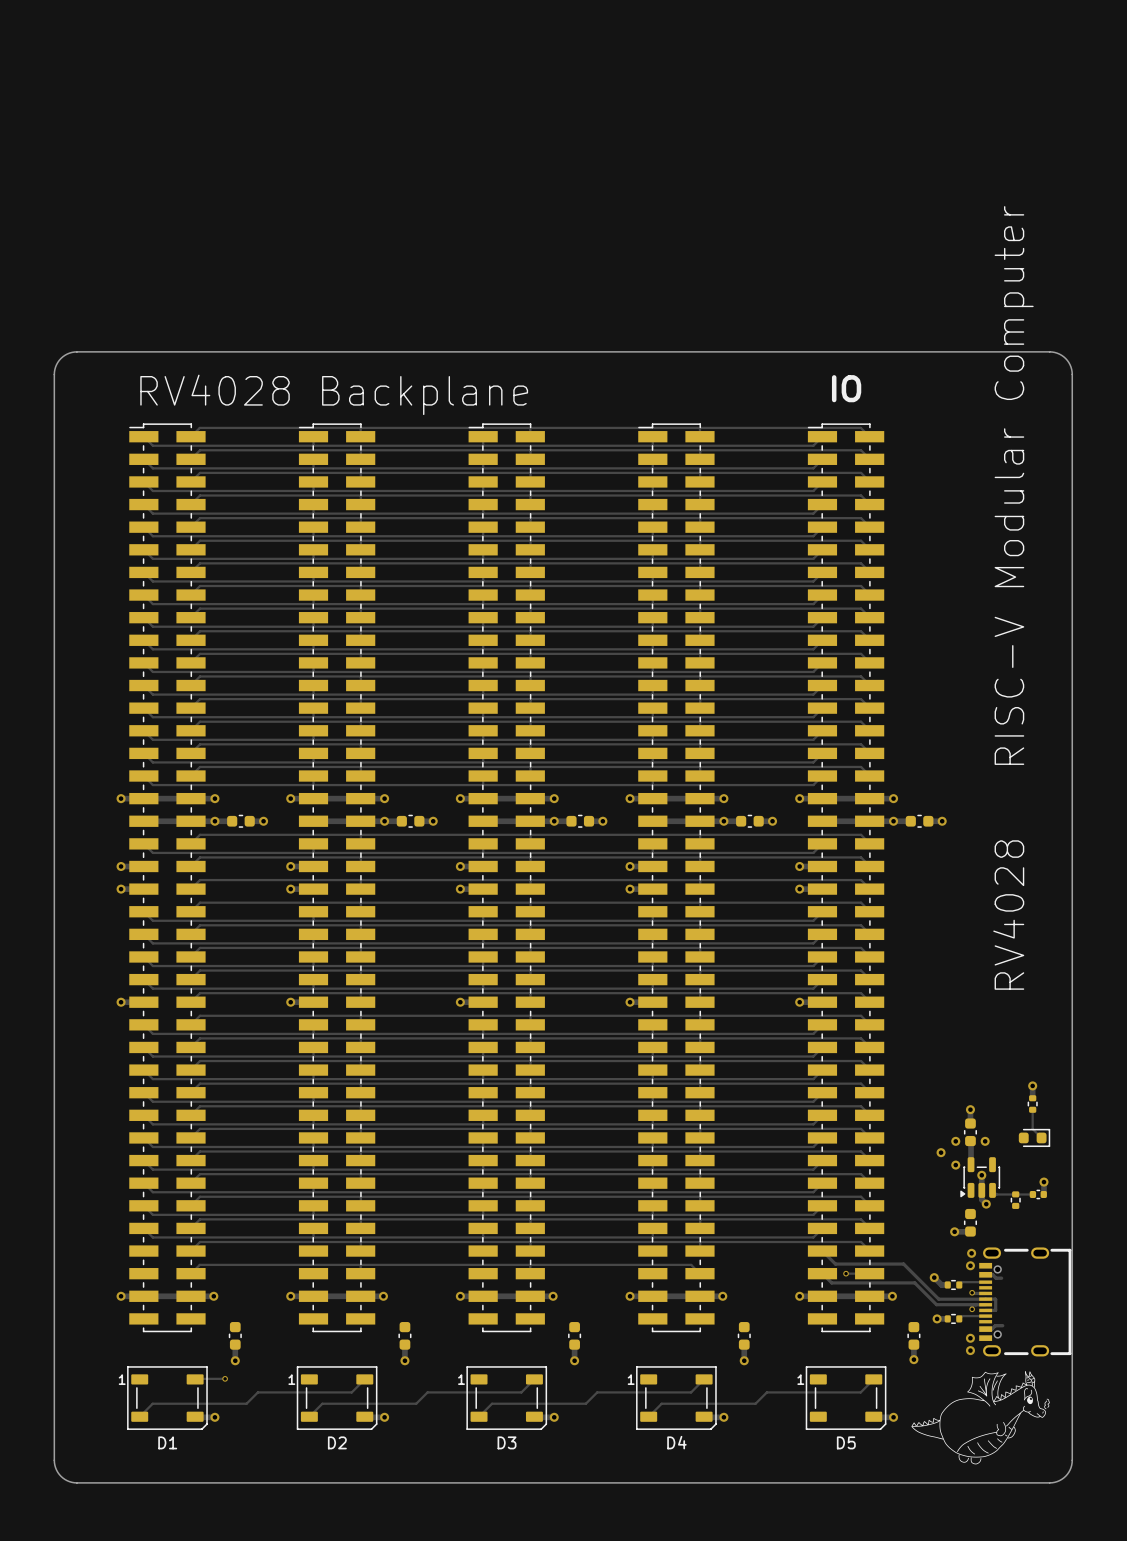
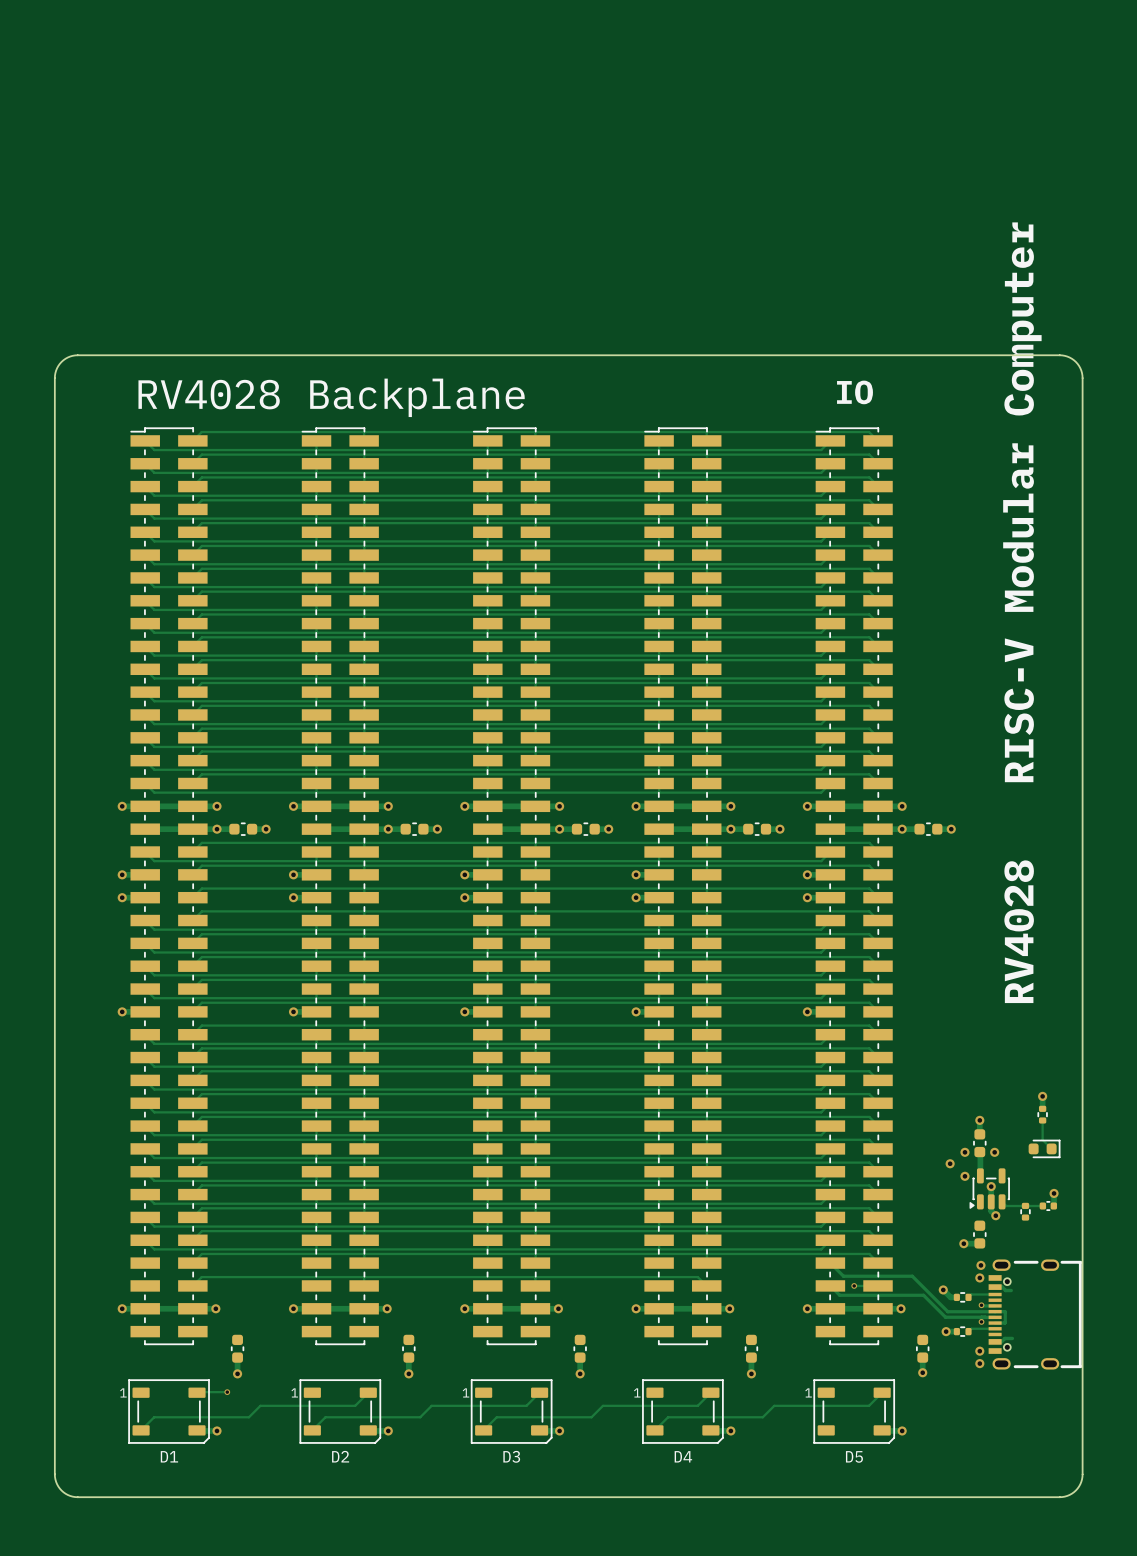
drawing: [911, 1371, 1050, 1465] -> none

